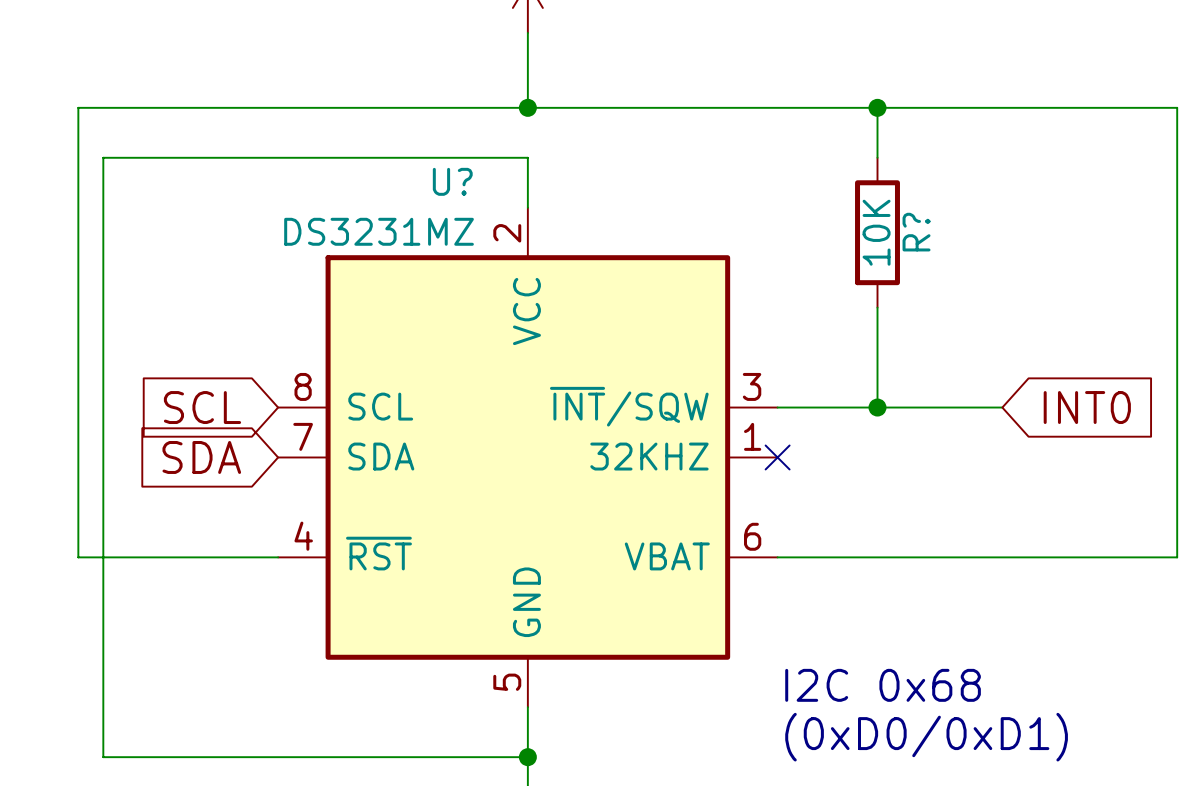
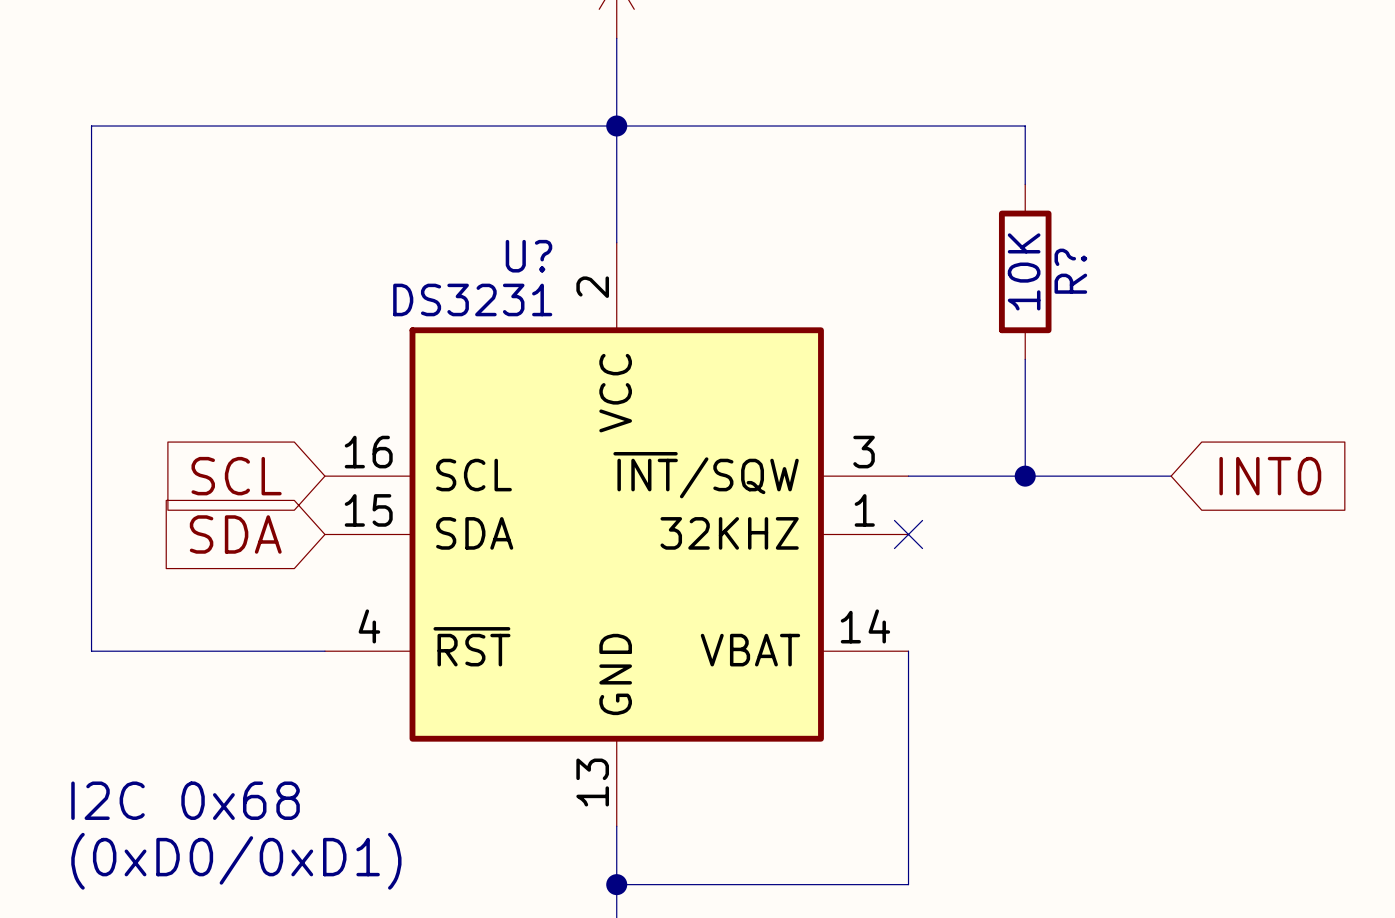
wire: none -> (616, 126) (616, 184)
wire: (877, 107) (1177, 107) (1177, 557) (777, 557) -> none
junction: (877, 107) -> none
wire: (527, 157) (103, 157) (103, 757) (527, 757) -> (908, 651) (908, 884) (616, 884)
U? symbol: [278, 207, 778, 708] -> [324, 242, 909, 827]
U? value: DS3231MZ (379, 231) -> DS3231 (472, 299)
text: none -> I2C 0x68 (185, 800)
text: I2C 0x68 (883, 685) -> none
text: none -> (0xD0/0xD1) (236, 861)
text: (0xD0/0xD1) (926, 737) -> none

